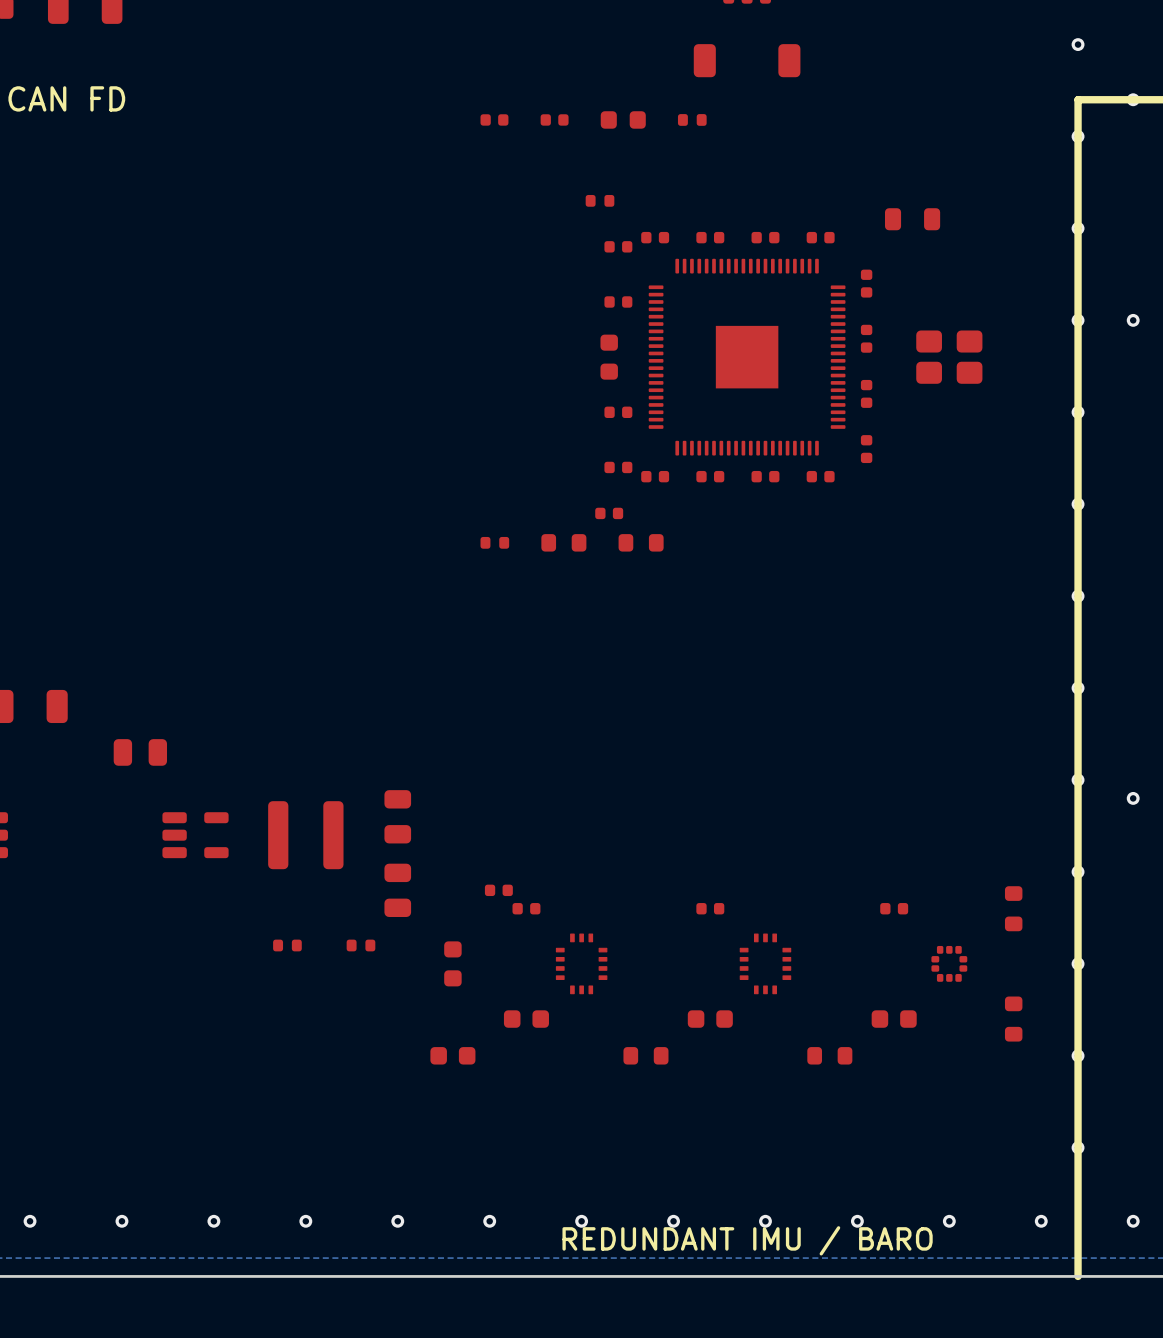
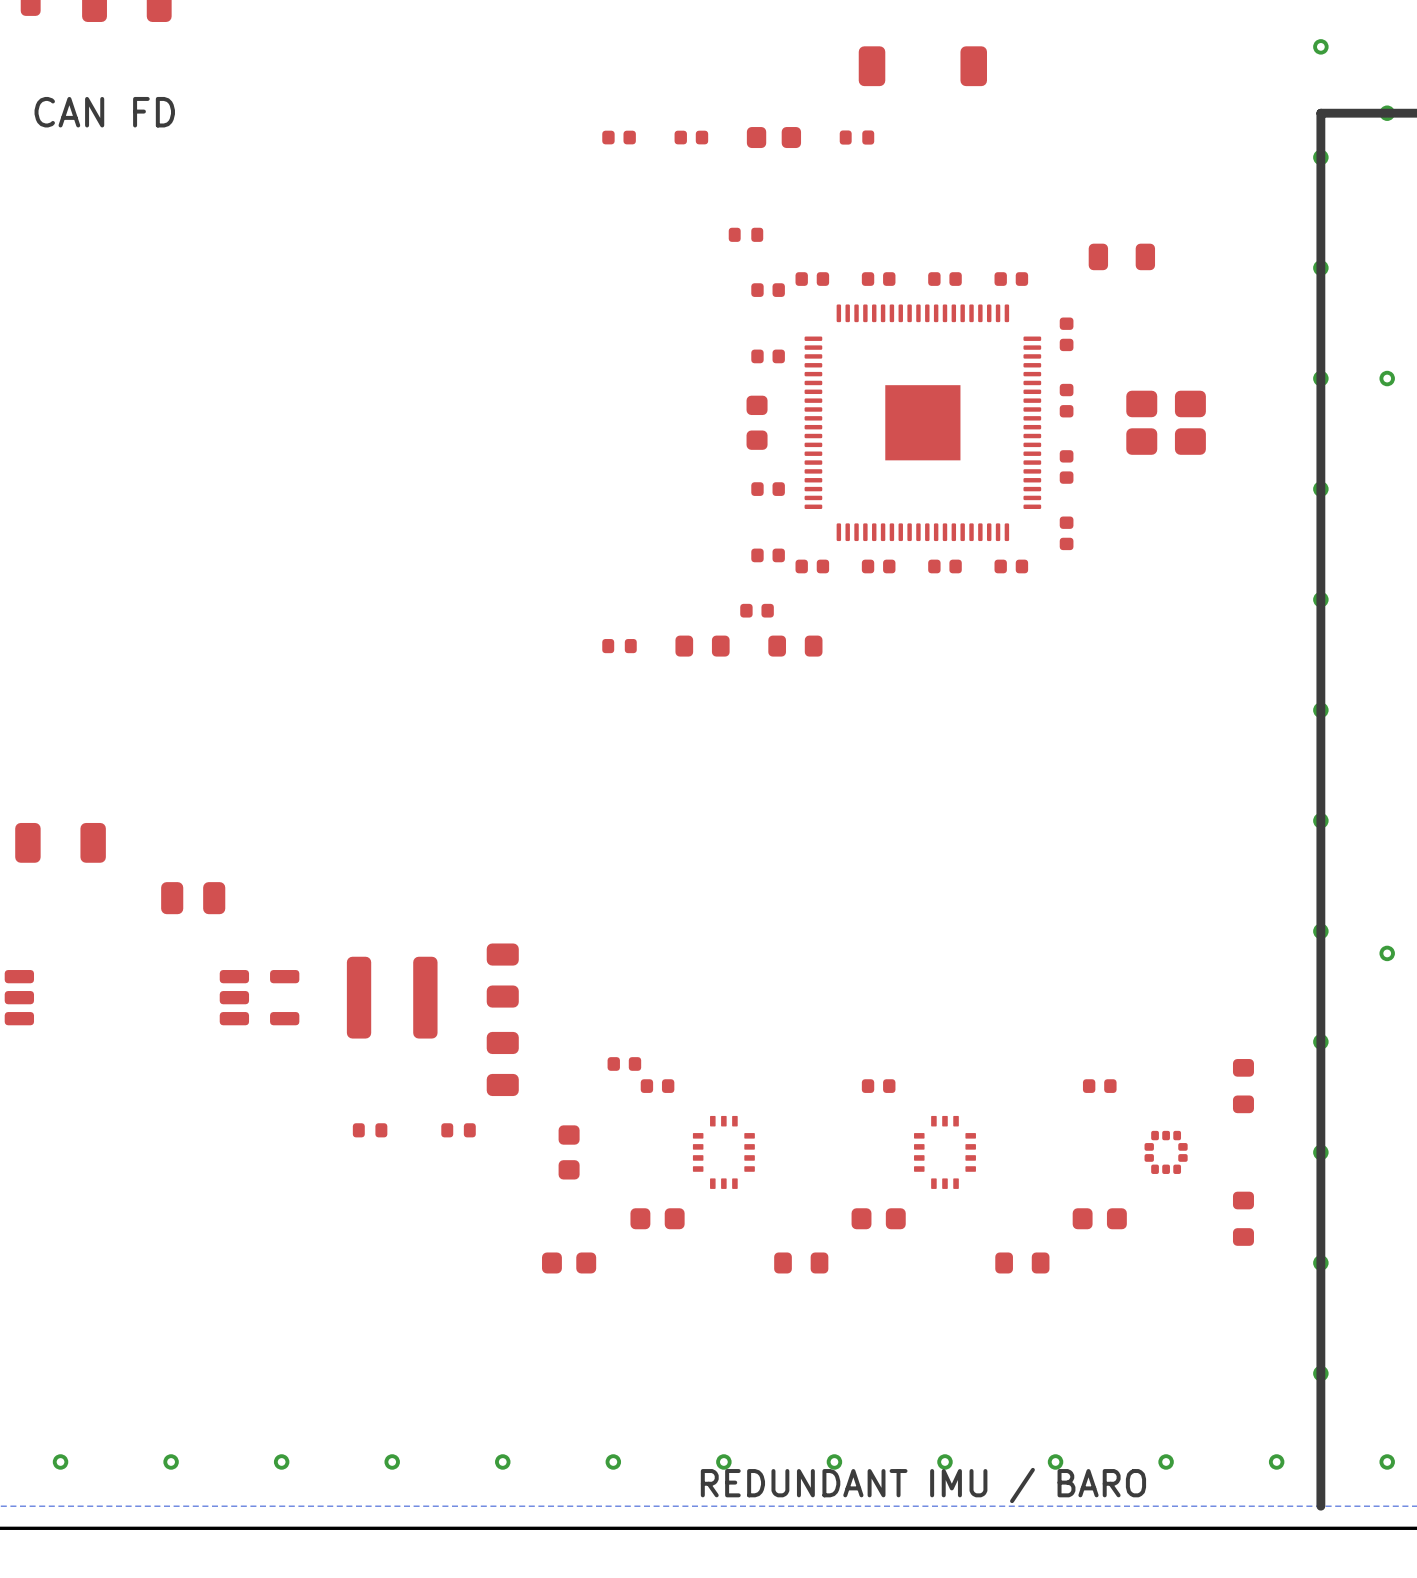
line: (1078, 1258) (1078, 1276) -> none

